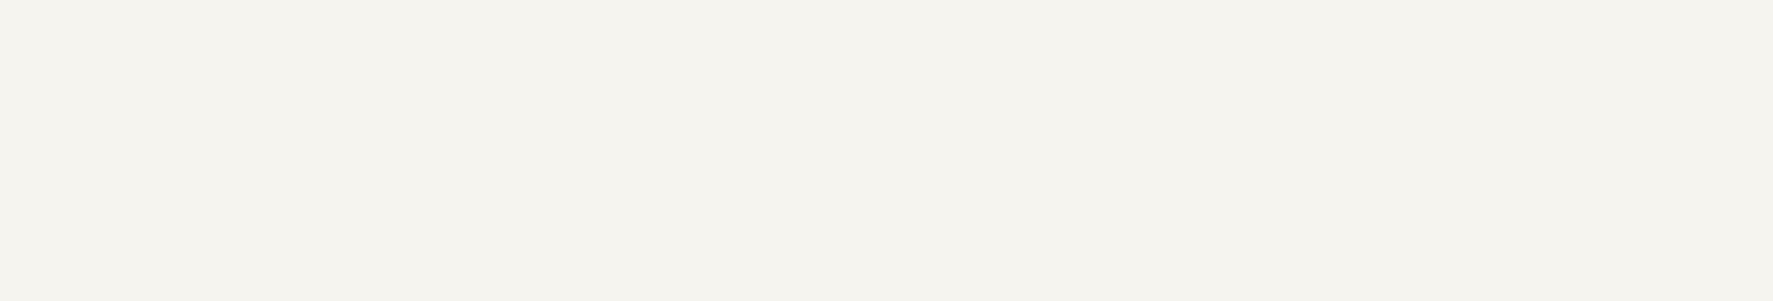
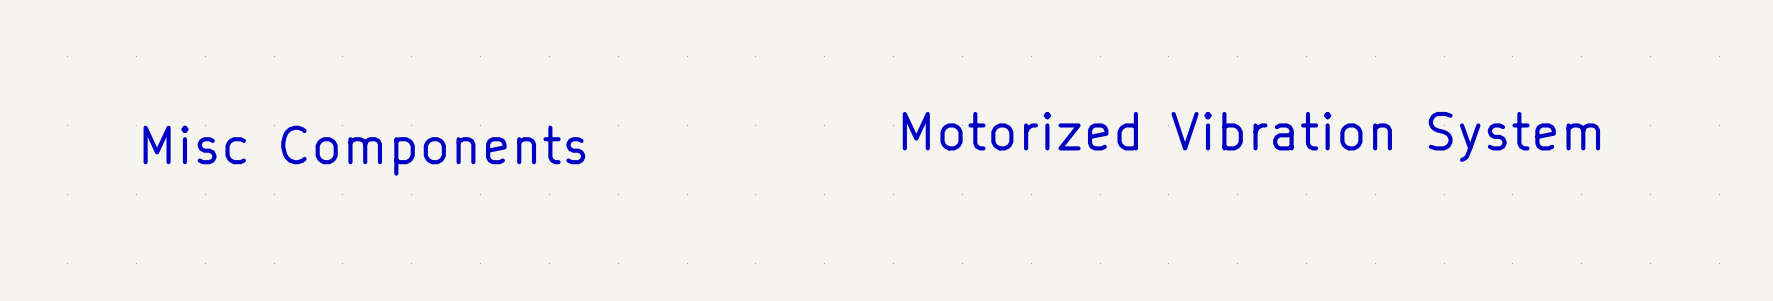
text: none -> Motorized Vibration System (1251, 136)
text: none -> Misc Components (364, 150)

